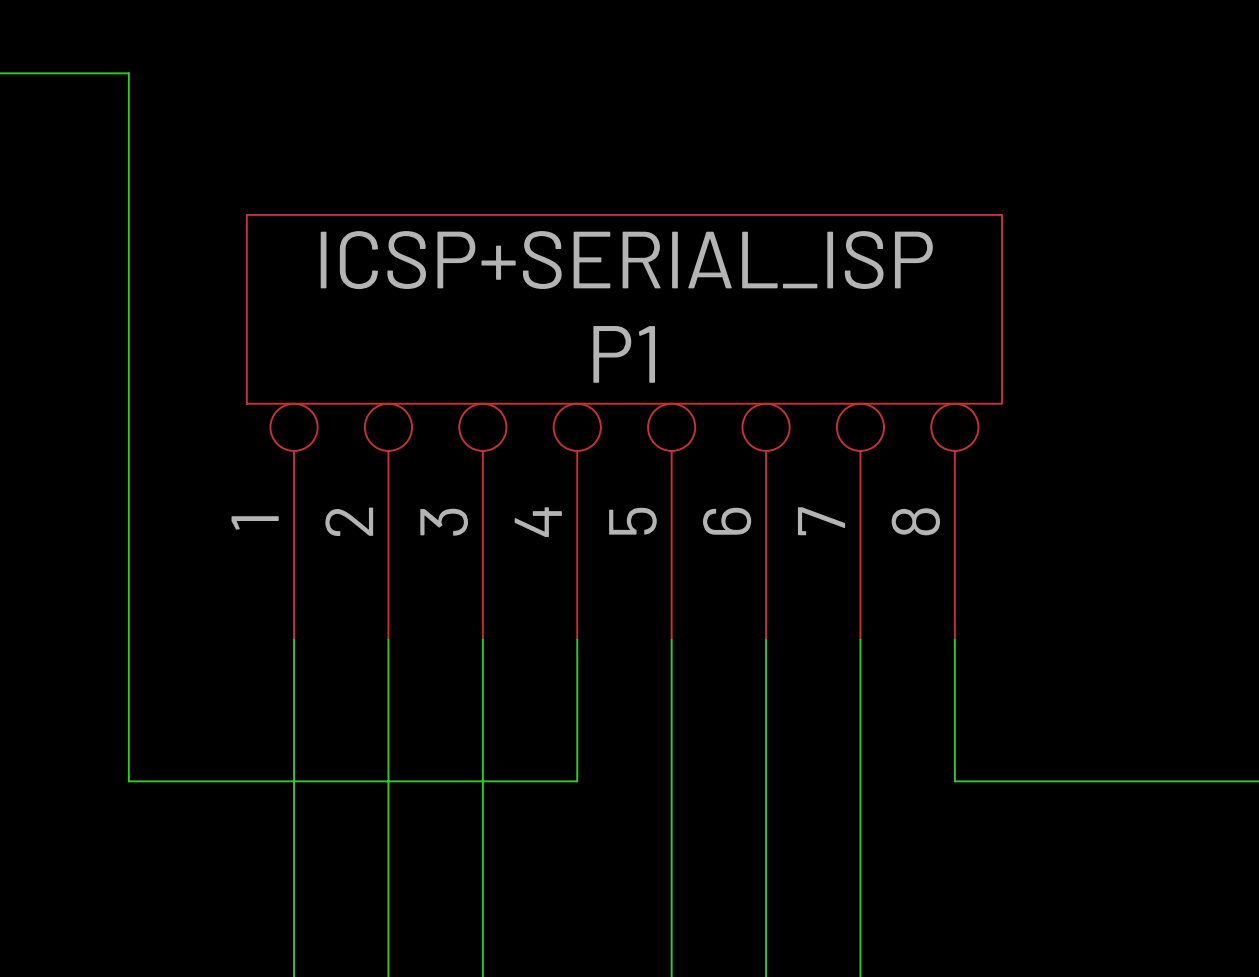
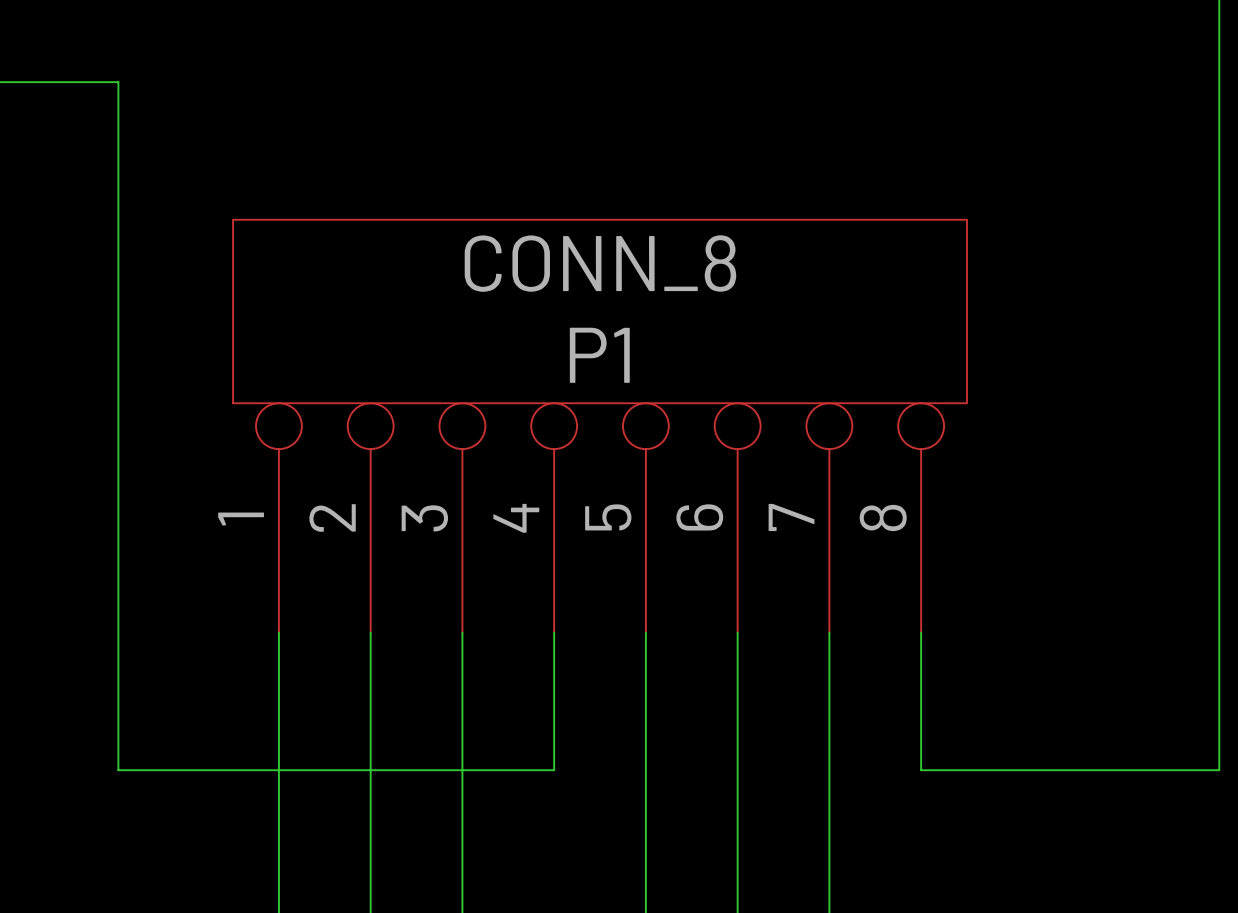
P1 value: ICSP+SERIAL_ISP (626, 260) -> CONN_8 (600, 263)

